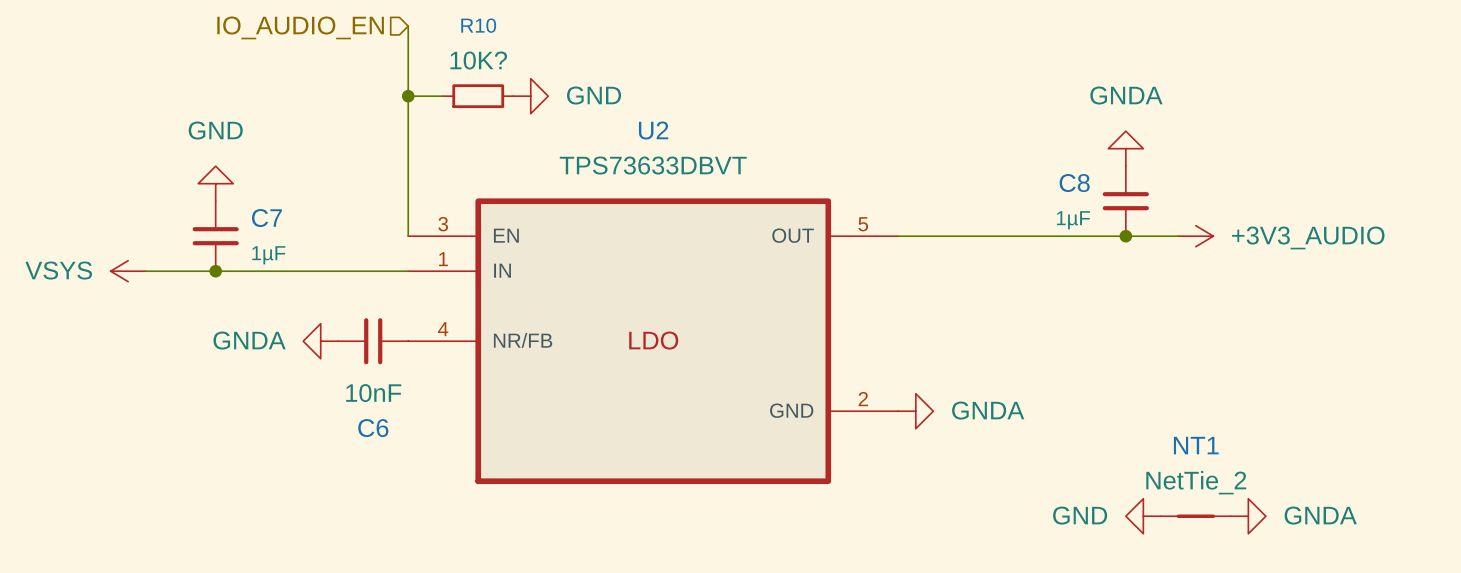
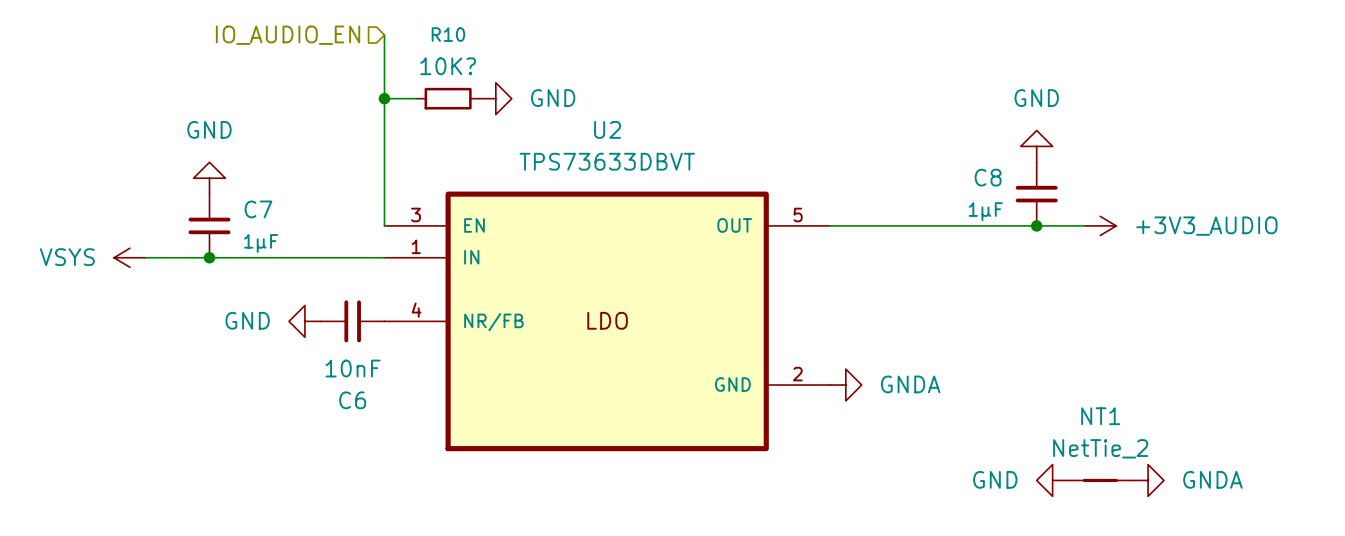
power symbol: GNDA (1125, 148) -> GND (1036, 146)
power symbol: GNDA (320, 341) -> GND (304, 321)

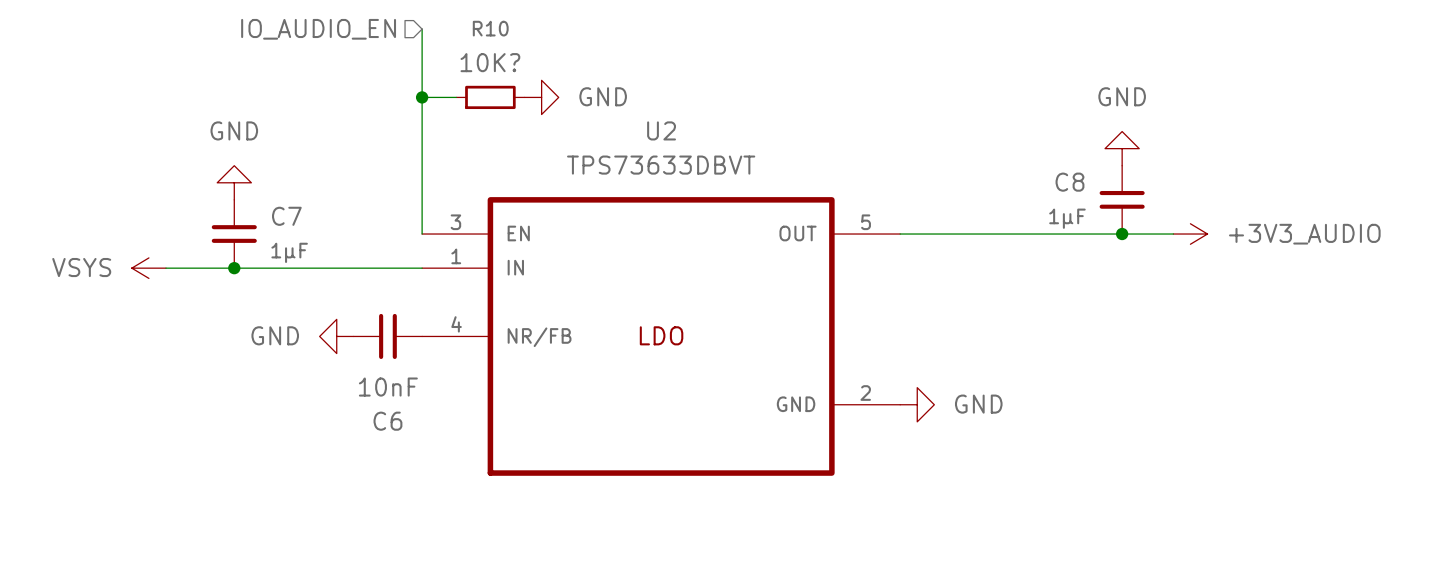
power symbol: GNDA (845, 385) -> GND (917, 404)
power symbol: GND (1052, 480) -> none
NT1: NetTie_2 (1100, 480) -> none
power symbol: GNDA (1148, 480) -> none

